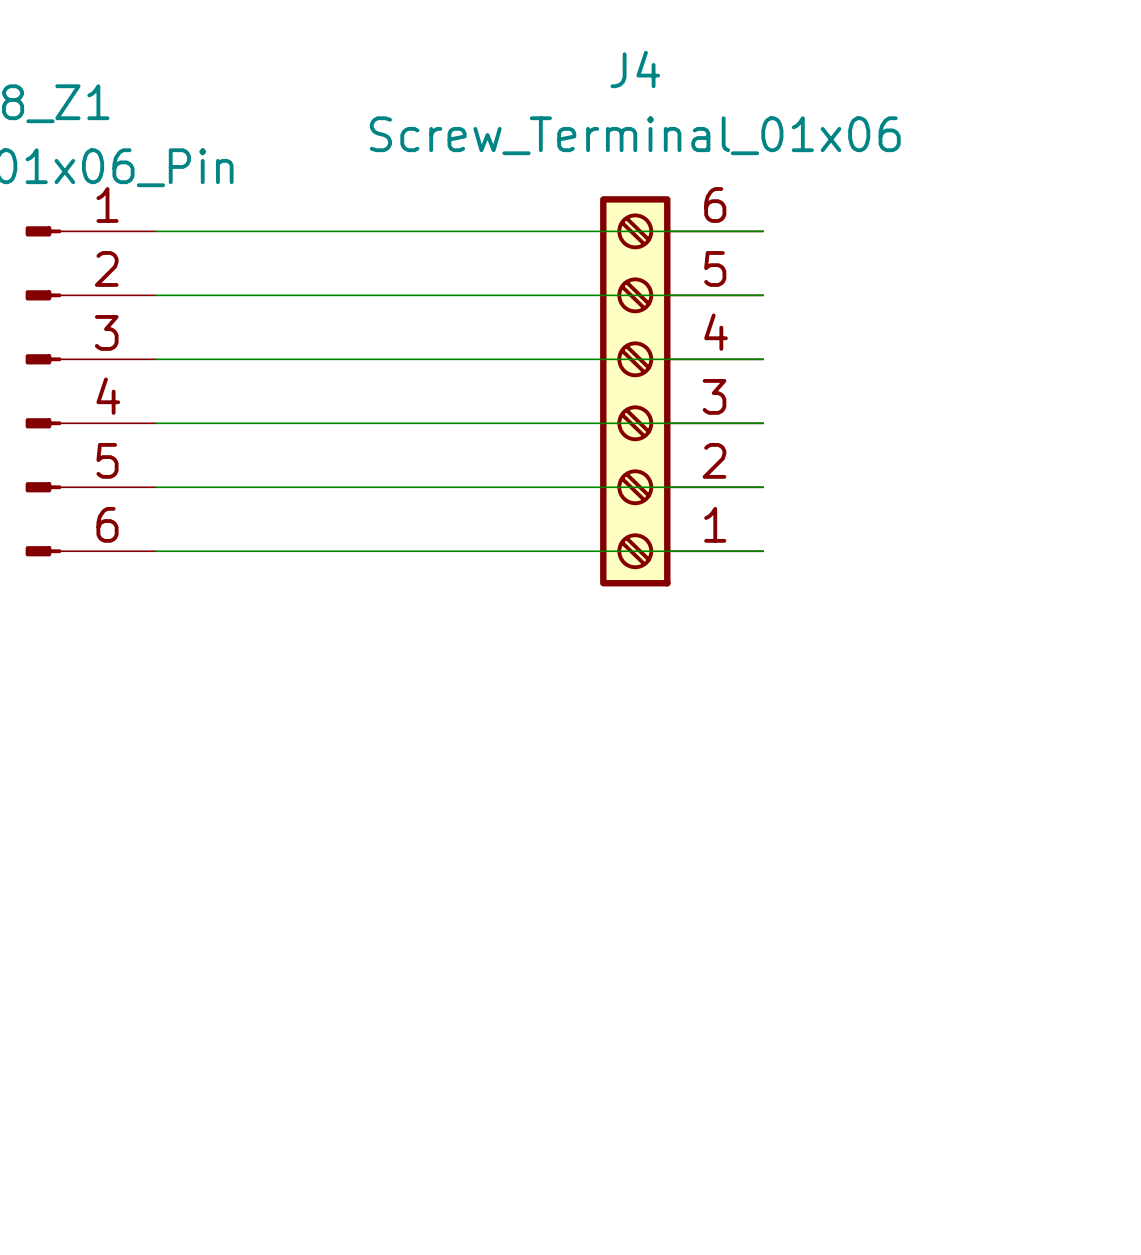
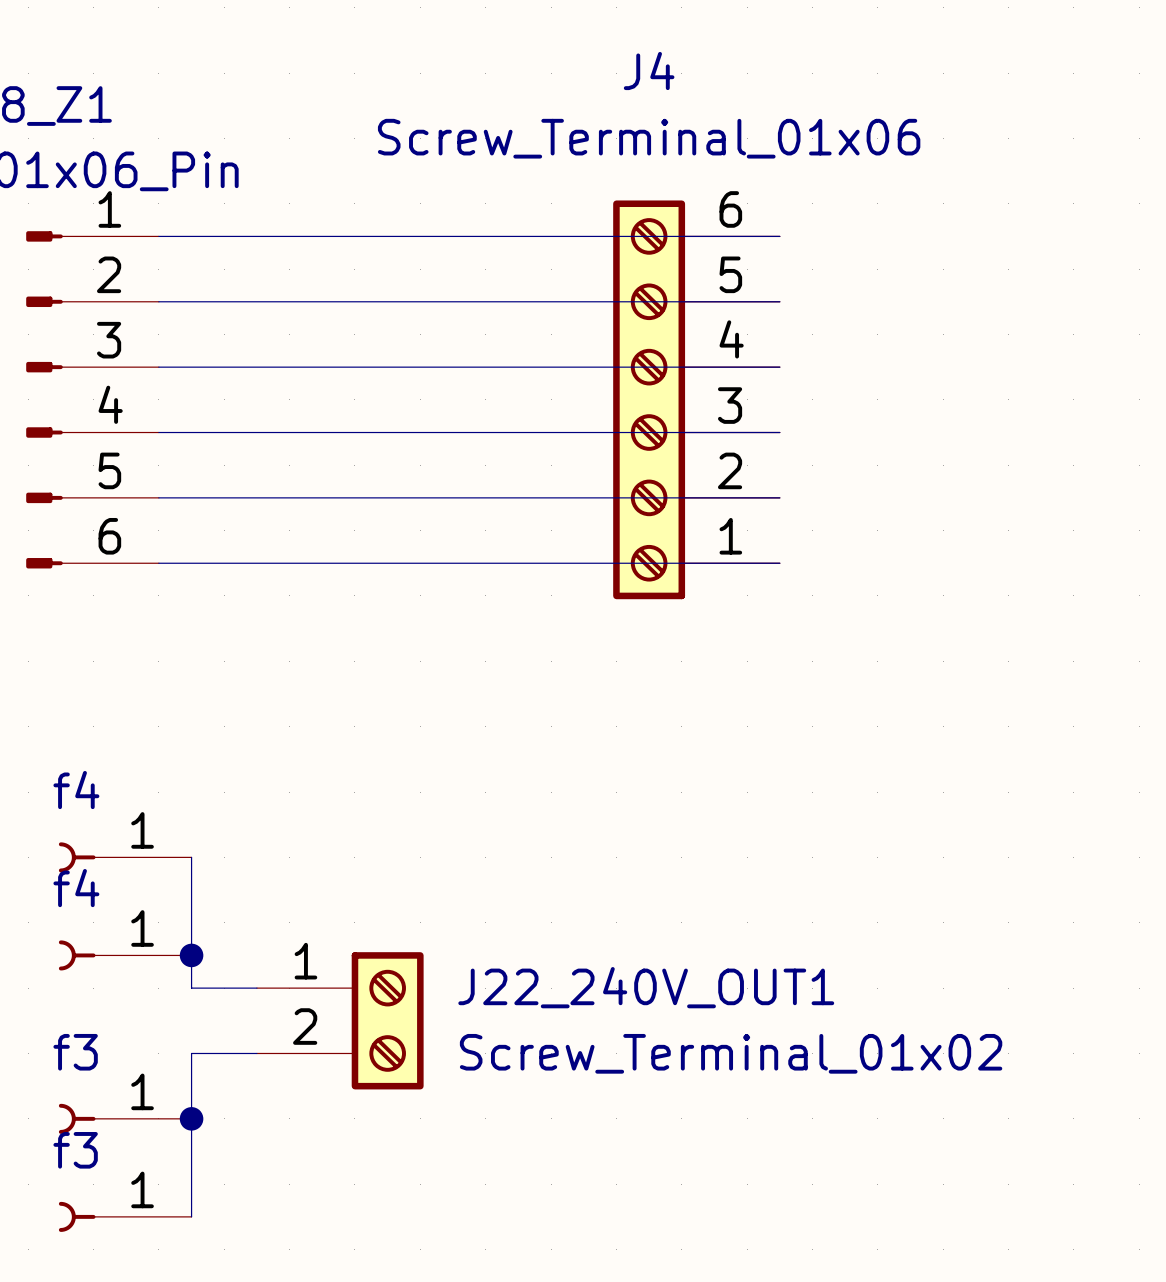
part: none -> f4 (125, 857)
wire: none -> (191, 857) (191, 988) (256, 988)
part: none -> f4 (125, 955)
junction: none -> (191, 955)
J22_240V_OUT1: none -> Screw_Terminal_01x02 (340, 1020)
wire: none -> (256, 1053) (191, 1053) (191, 1216)
part: none -> f3 (125, 1118)
junction: none -> (191, 1118)
part: none -> f3 (125, 1216)

